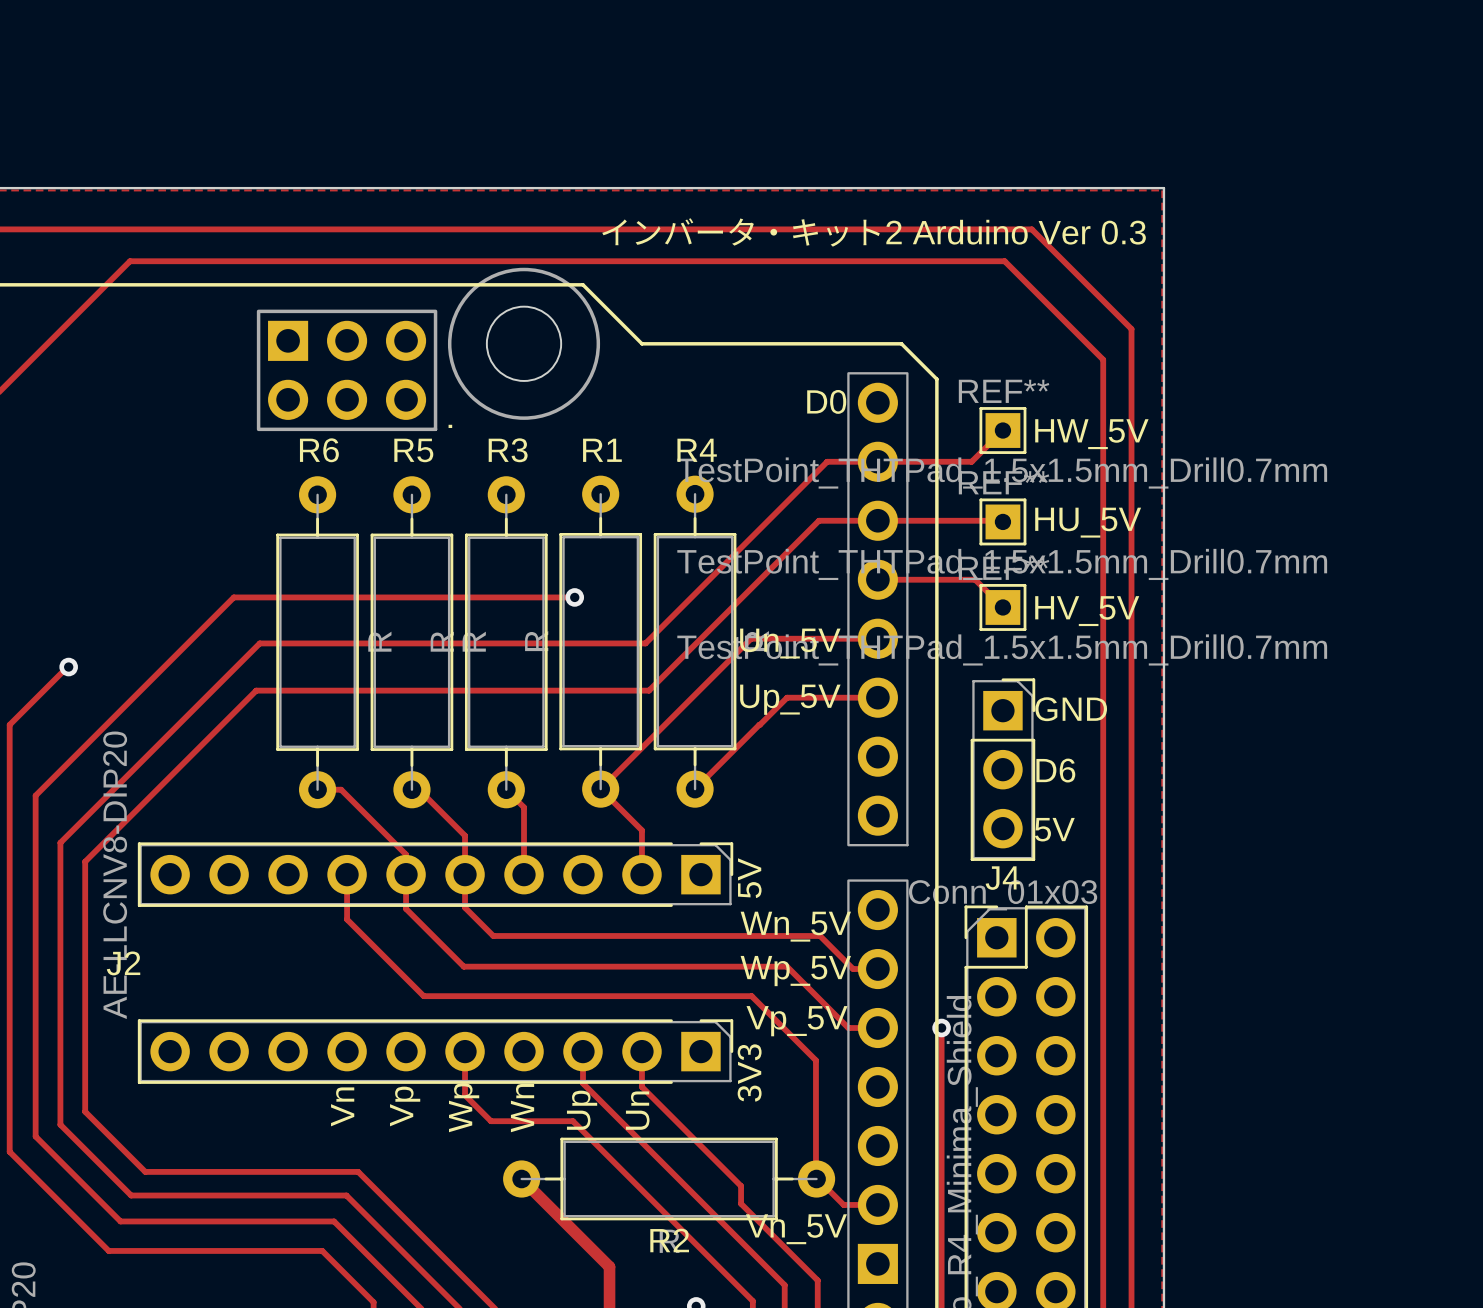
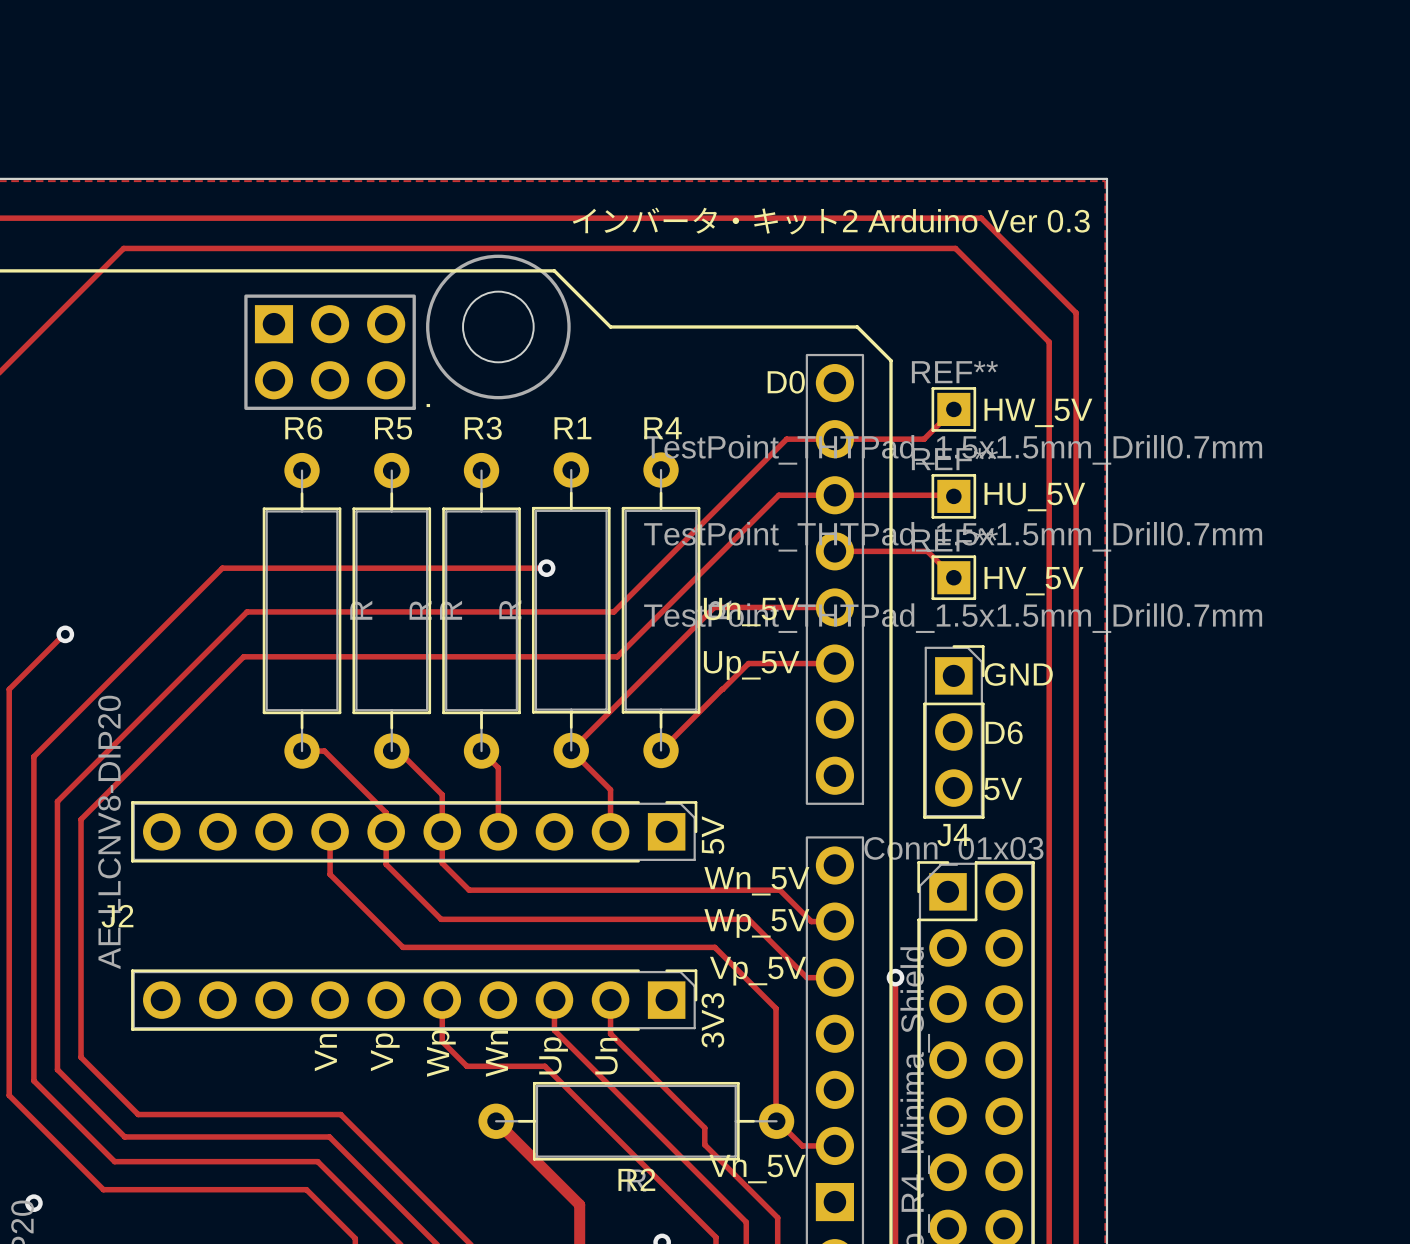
via: none -> (33, 1203)

